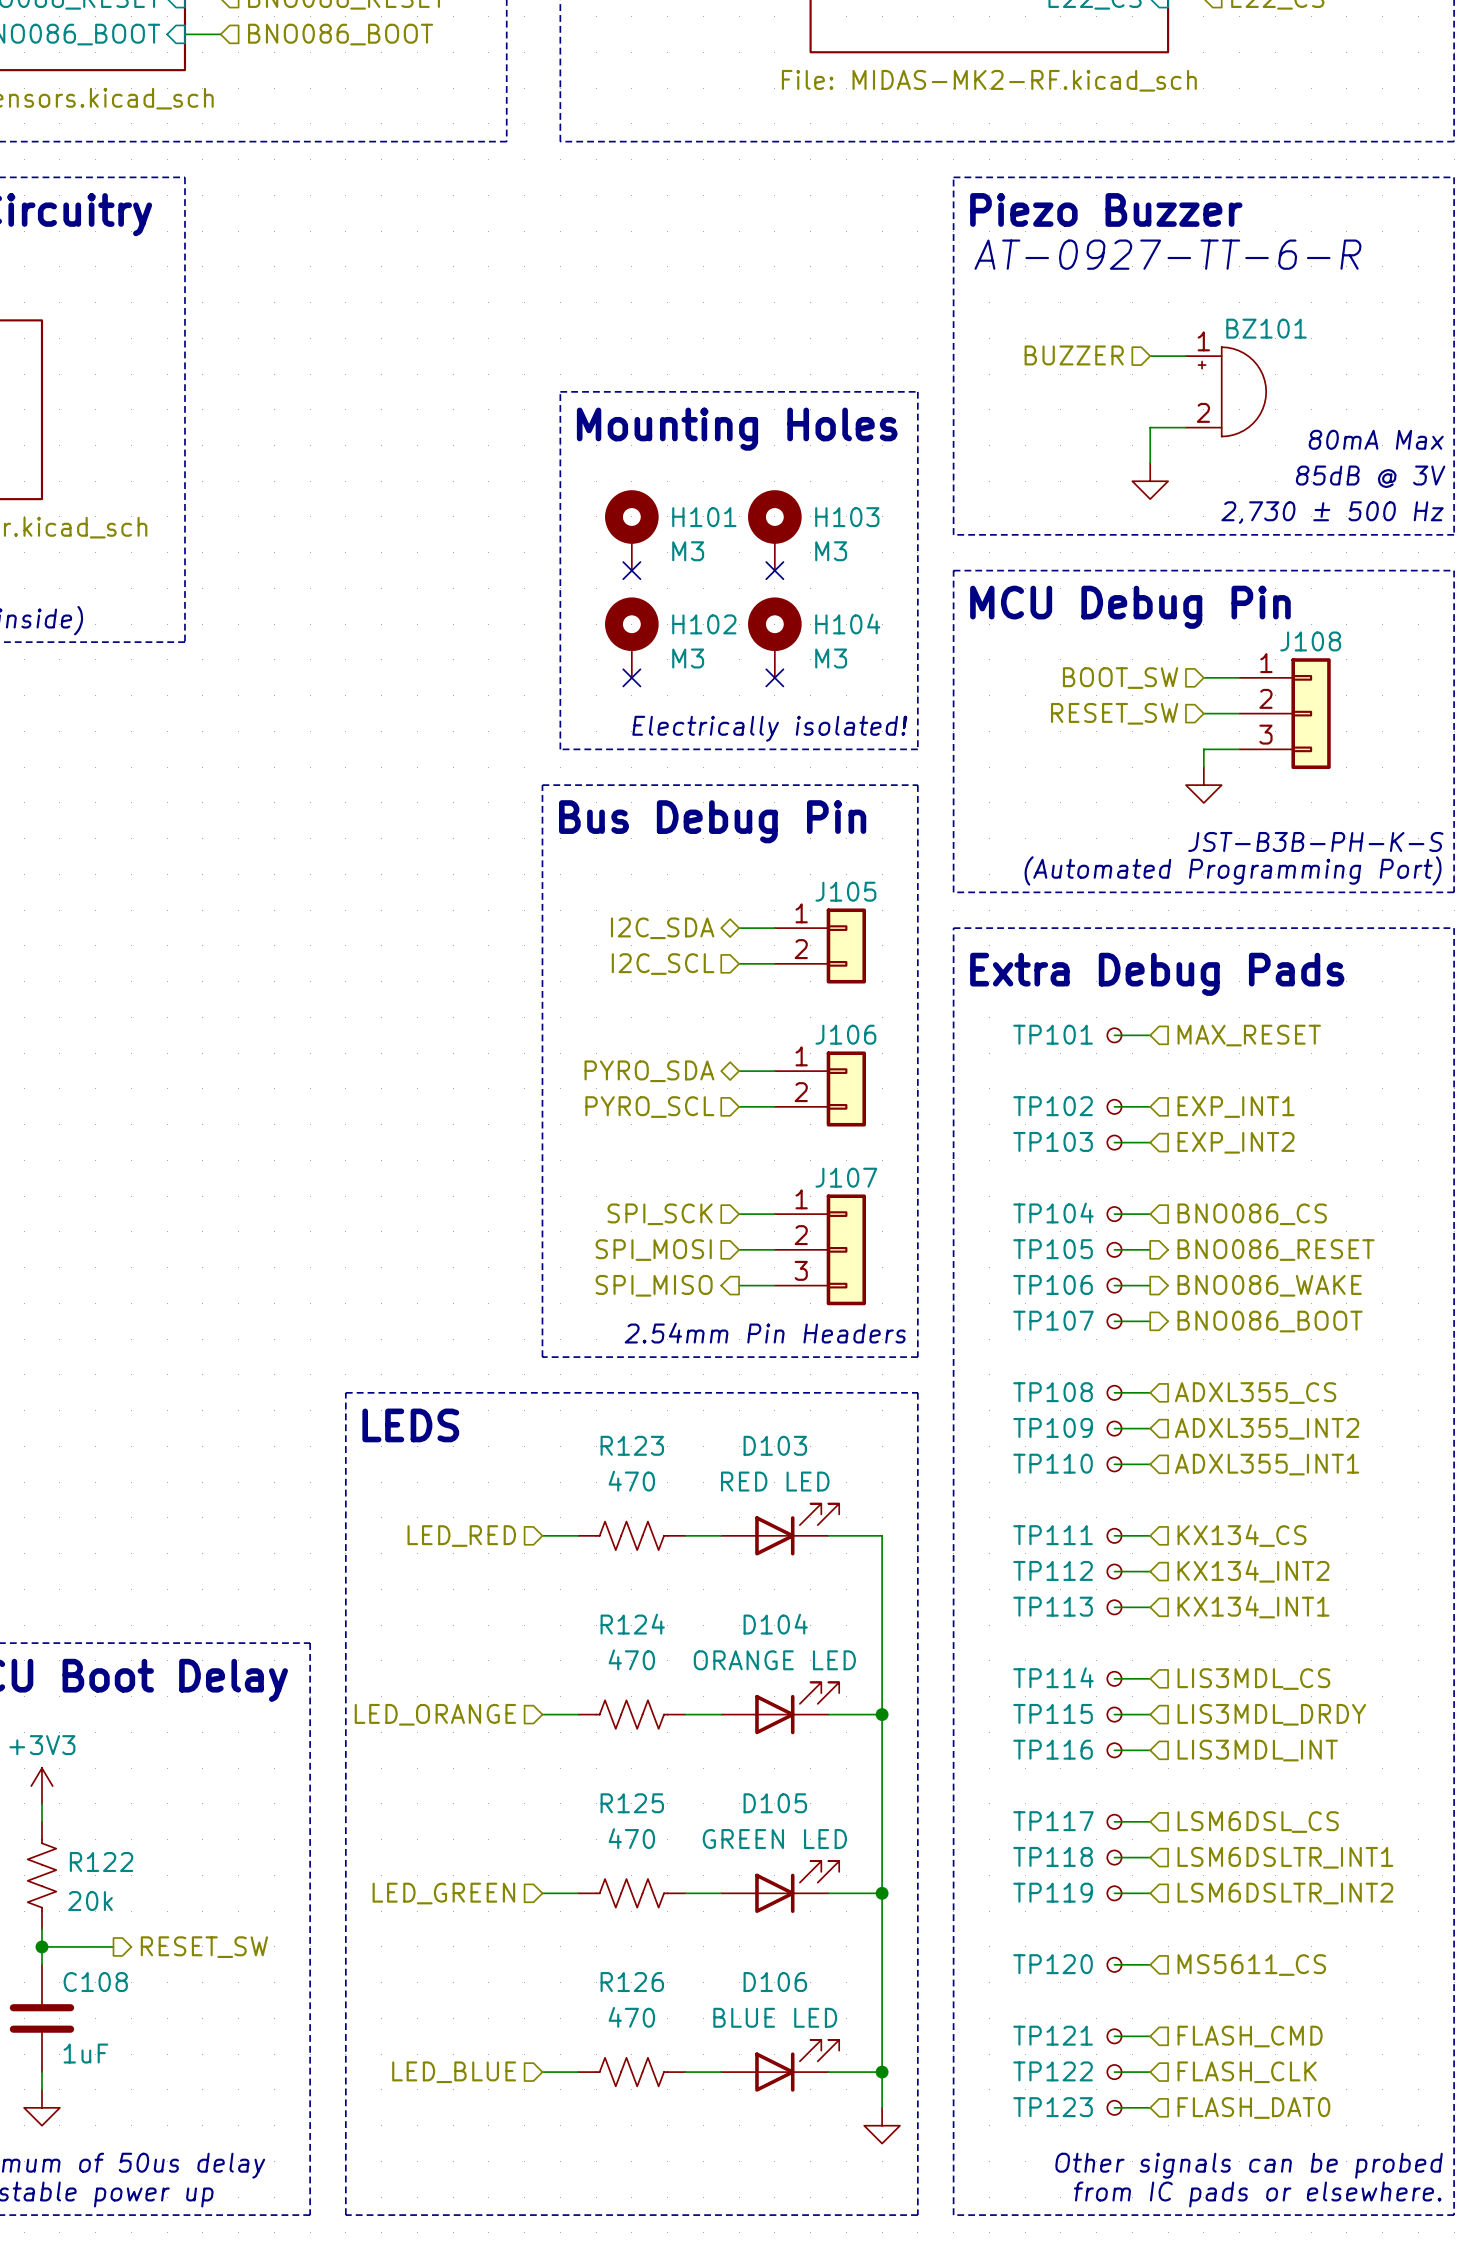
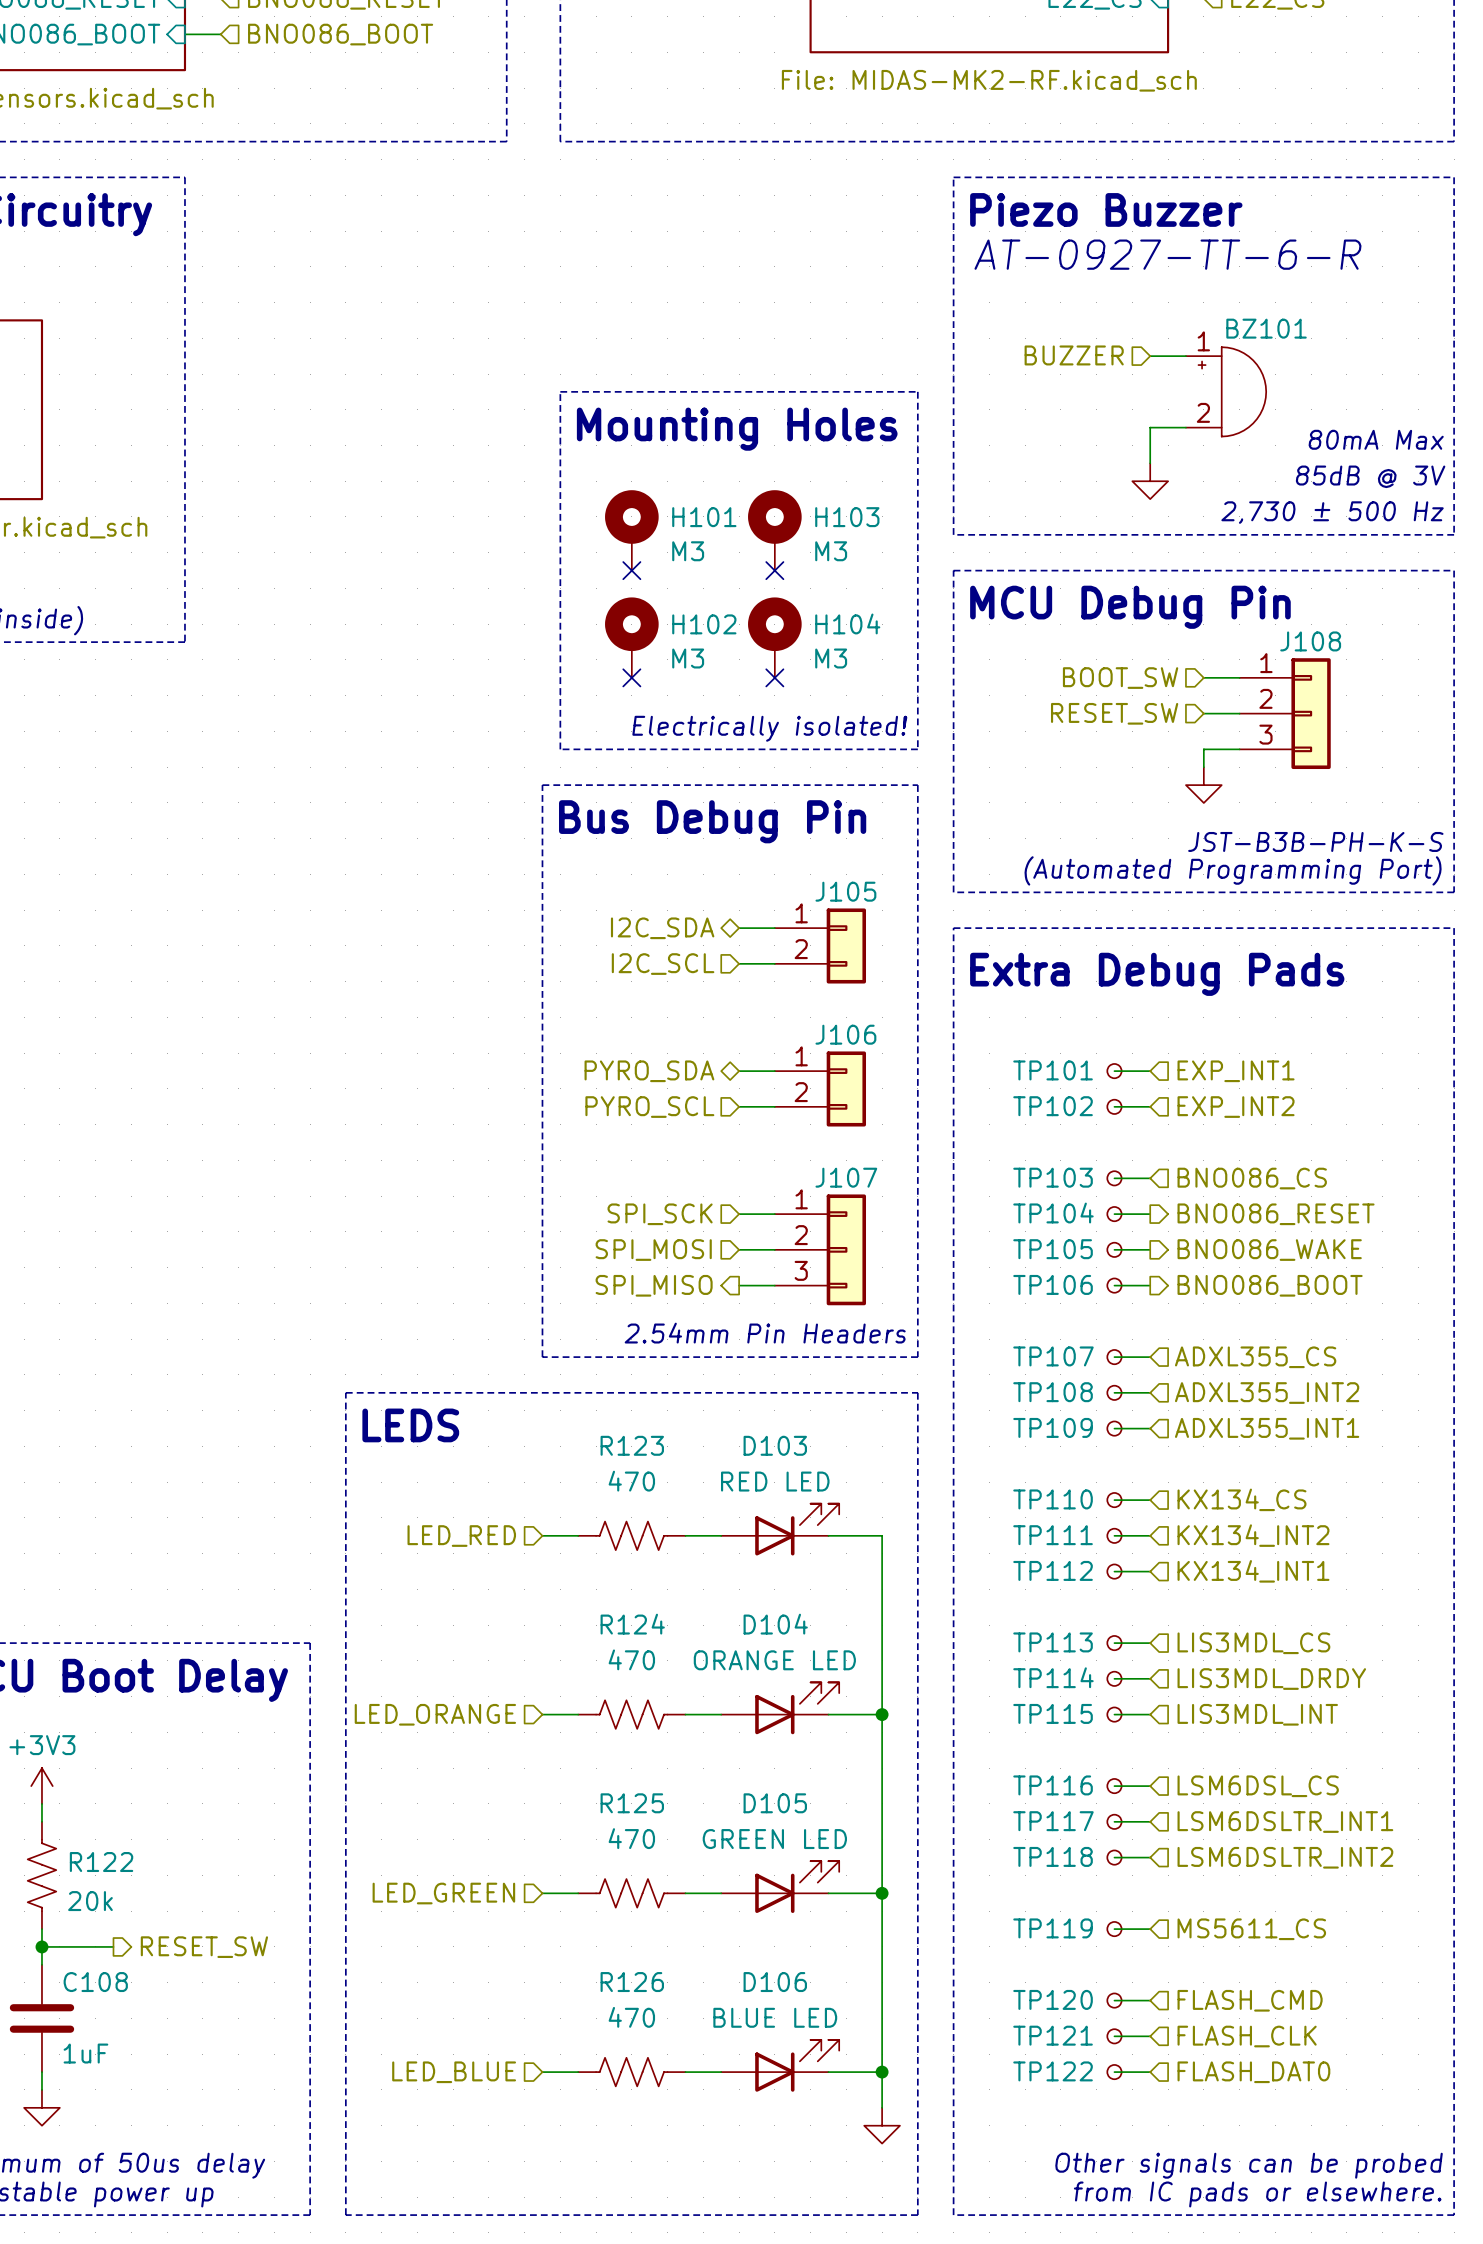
wire: (1114, 1035) (1150, 1035) -> (1114, 1071) (1150, 1071)
TP101 position: (1114, 1035) -> (1114, 1071)
hierarchical label: MAX_RESET (1249, 1035) -> none
hierarchical label: none -> EXP_INT1 (1236, 1071)
hierarchical label: EXP_INT1 (1236, 1107) -> EXP_INT2 (1236, 1107)
wire: (1114, 1142) (1150, 1142) -> (1114, 1178) (1150, 1178)
TP103 position: (1114, 1142) -> (1114, 1178)
hierarchical label: EXP_INT2 (1236, 1142) -> none
hierarchical label: none -> BNO086_CS (1252, 1178)
hierarchical label shape: input (1252, 1214) -> output (1276, 1214)
hierarchical label: BNO086_CS (1252, 1214) -> BNO086_RESET (1276, 1214)
hierarchical label: BNO086_RESET (1276, 1250) -> BNO086_WAKE (1269, 1250)
hierarchical label: BNO086_WAKE (1269, 1285) -> BNO086_BOOT (1270, 1285)
wire: (1114, 1321) (1150, 1321) -> (1114, 1357) (1150, 1357)
TP107 position: (1114, 1321) -> (1114, 1357)
hierarchical label: BNO086_BOOT (1270, 1321) -> none
hierarchical label: none -> ADXL355_CS (1255, 1357)
hierarchical label: ADXL355_CS (1255, 1393) -> ADXL355_INT2 (1267, 1393)
hierarchical label: ADXL355_INT2 (1267, 1428) -> ADXL355_INT1 (1267, 1428)
wire: (1114, 1464) (1150, 1464) -> (1114, 1500) (1150, 1500)
TP110 position: (1114, 1464) -> (1114, 1500)
hierarchical label: ADXL355_INT1 (1267, 1464) -> none
hierarchical label: none -> KX134_CS (1241, 1499)
hierarchical label: KX134_CS (1241, 1535) -> KX134_INT2 (1253, 1535)
hierarchical label: KX134_INT2 (1253, 1571) -> KX134_INT1 (1253, 1571)
wire: (1114, 1607) (1150, 1607) -> (1114, 1643) (1150, 1643)
TP113 position: (1114, 1607) -> (1114, 1643)
hierarchical label: KX134_INT1 (1253, 1607) -> none
hierarchical label: none -> LIS3MDL_CS (1253, 1643)
hierarchical label: LIS3MDL_CS (1253, 1679) -> LIS3MDL_DRDY (1271, 1679)
hierarchical label: LIS3MDL_DRDY (1271, 1714) -> LIS3MDL_INT (1257, 1714)
wire: (1114, 1750) (1150, 1750) -> (1114, 1786) (1150, 1786)
TP116 position: (1114, 1750) -> (1114, 1786)
hierarchical label: LIS3MDL_INT (1257, 1750) -> none
hierarchical label: none -> LSM6DSL_CS (1258, 1786)
hierarchical label: LSM6DSL_CS (1258, 1822) -> LSM6DSLTR_INT1 (1285, 1822)
hierarchical label: LSM6DSLTR_INT1 (1285, 1857) -> LSM6DSLTR_INT2 (1285, 1857)
wire: (1114, 1893) (1150, 1893) -> (1114, 1929) (1150, 1929)
TP119 position: (1114, 1893) -> (1114, 1929)
hierarchical label: LSM6DSLTR_INT2 (1285, 1893) -> none
wire: (1114, 1964) (1150, 1964) -> (1114, 2000) (1150, 2000)
TP120 position: (1114, 1964) -> (1114, 2000)
hierarchical label position: MS5611_CS (1251, 1965) -> MS5611_CS (1251, 1929)
hierarchical label: none -> FLASH_CMD (1250, 2000)
hierarchical label: FLASH_CMD (1250, 2036) -> FLASH_CLK (1247, 2036)
hierarchical label: FLASH_CLK (1247, 2072) -> FLASH_DAT0 (1253, 2072)
wire: (1114, 2107) (1150, 2107) -> none
TP123: (1114, 2107) -> none
hierarchical label: FLASH_DAT0 (1253, 2108) -> none

